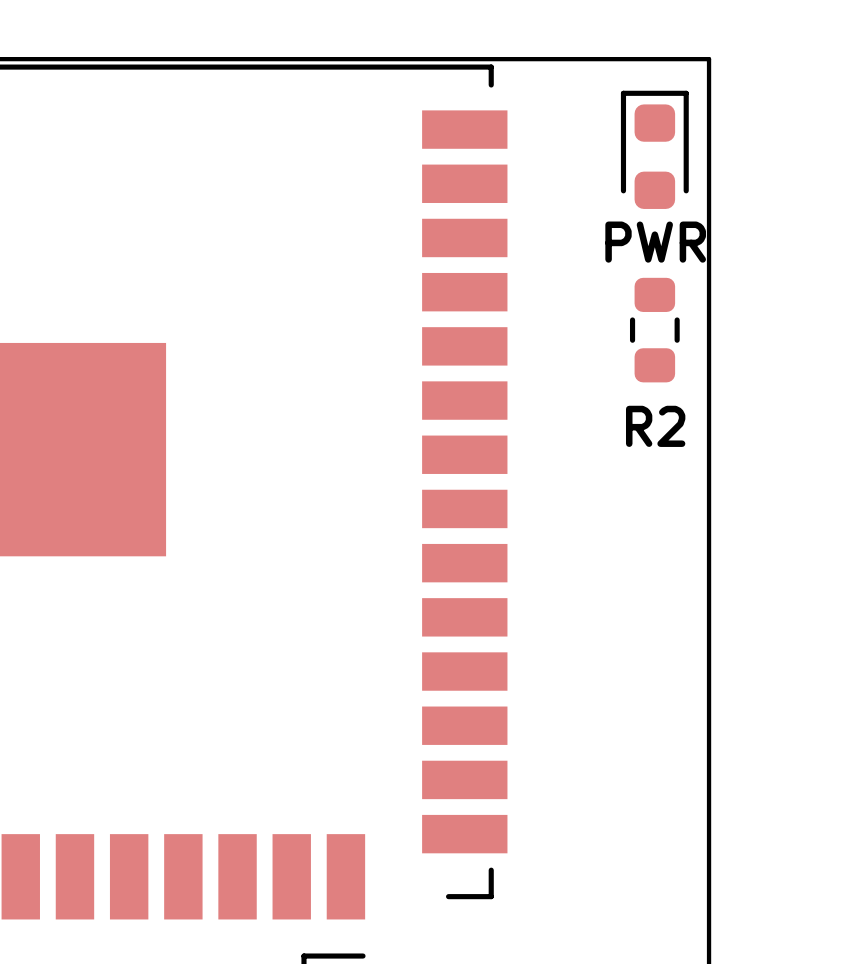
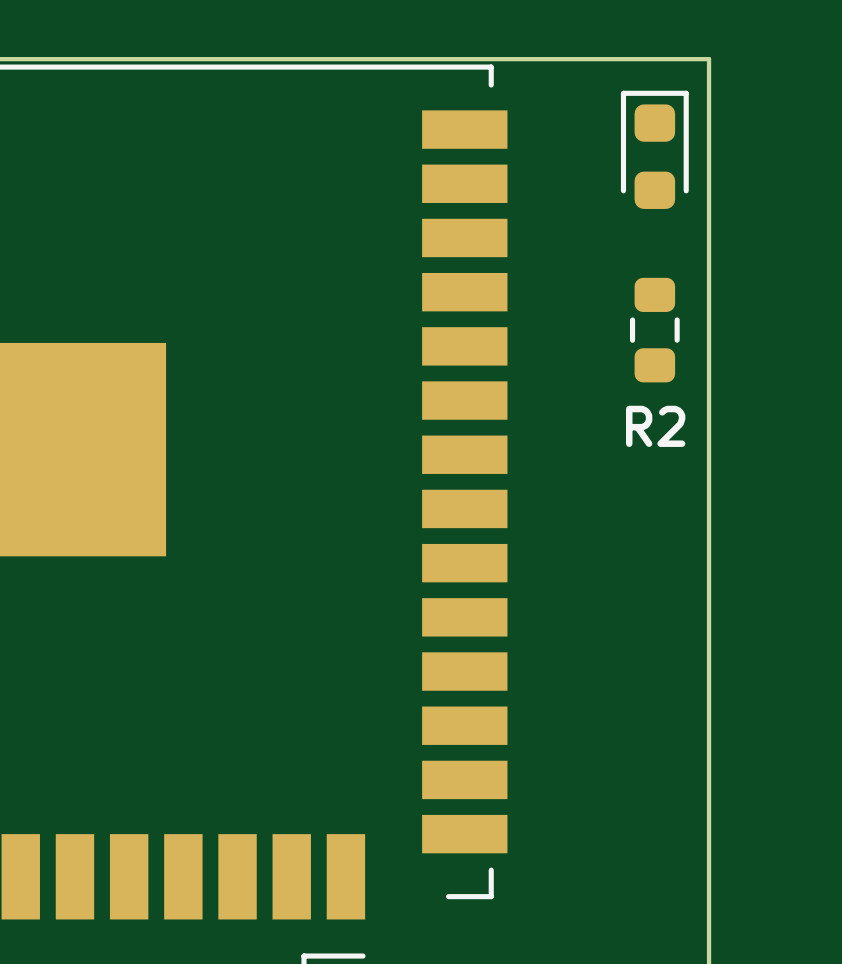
text: PWR (655, 242) -> none

